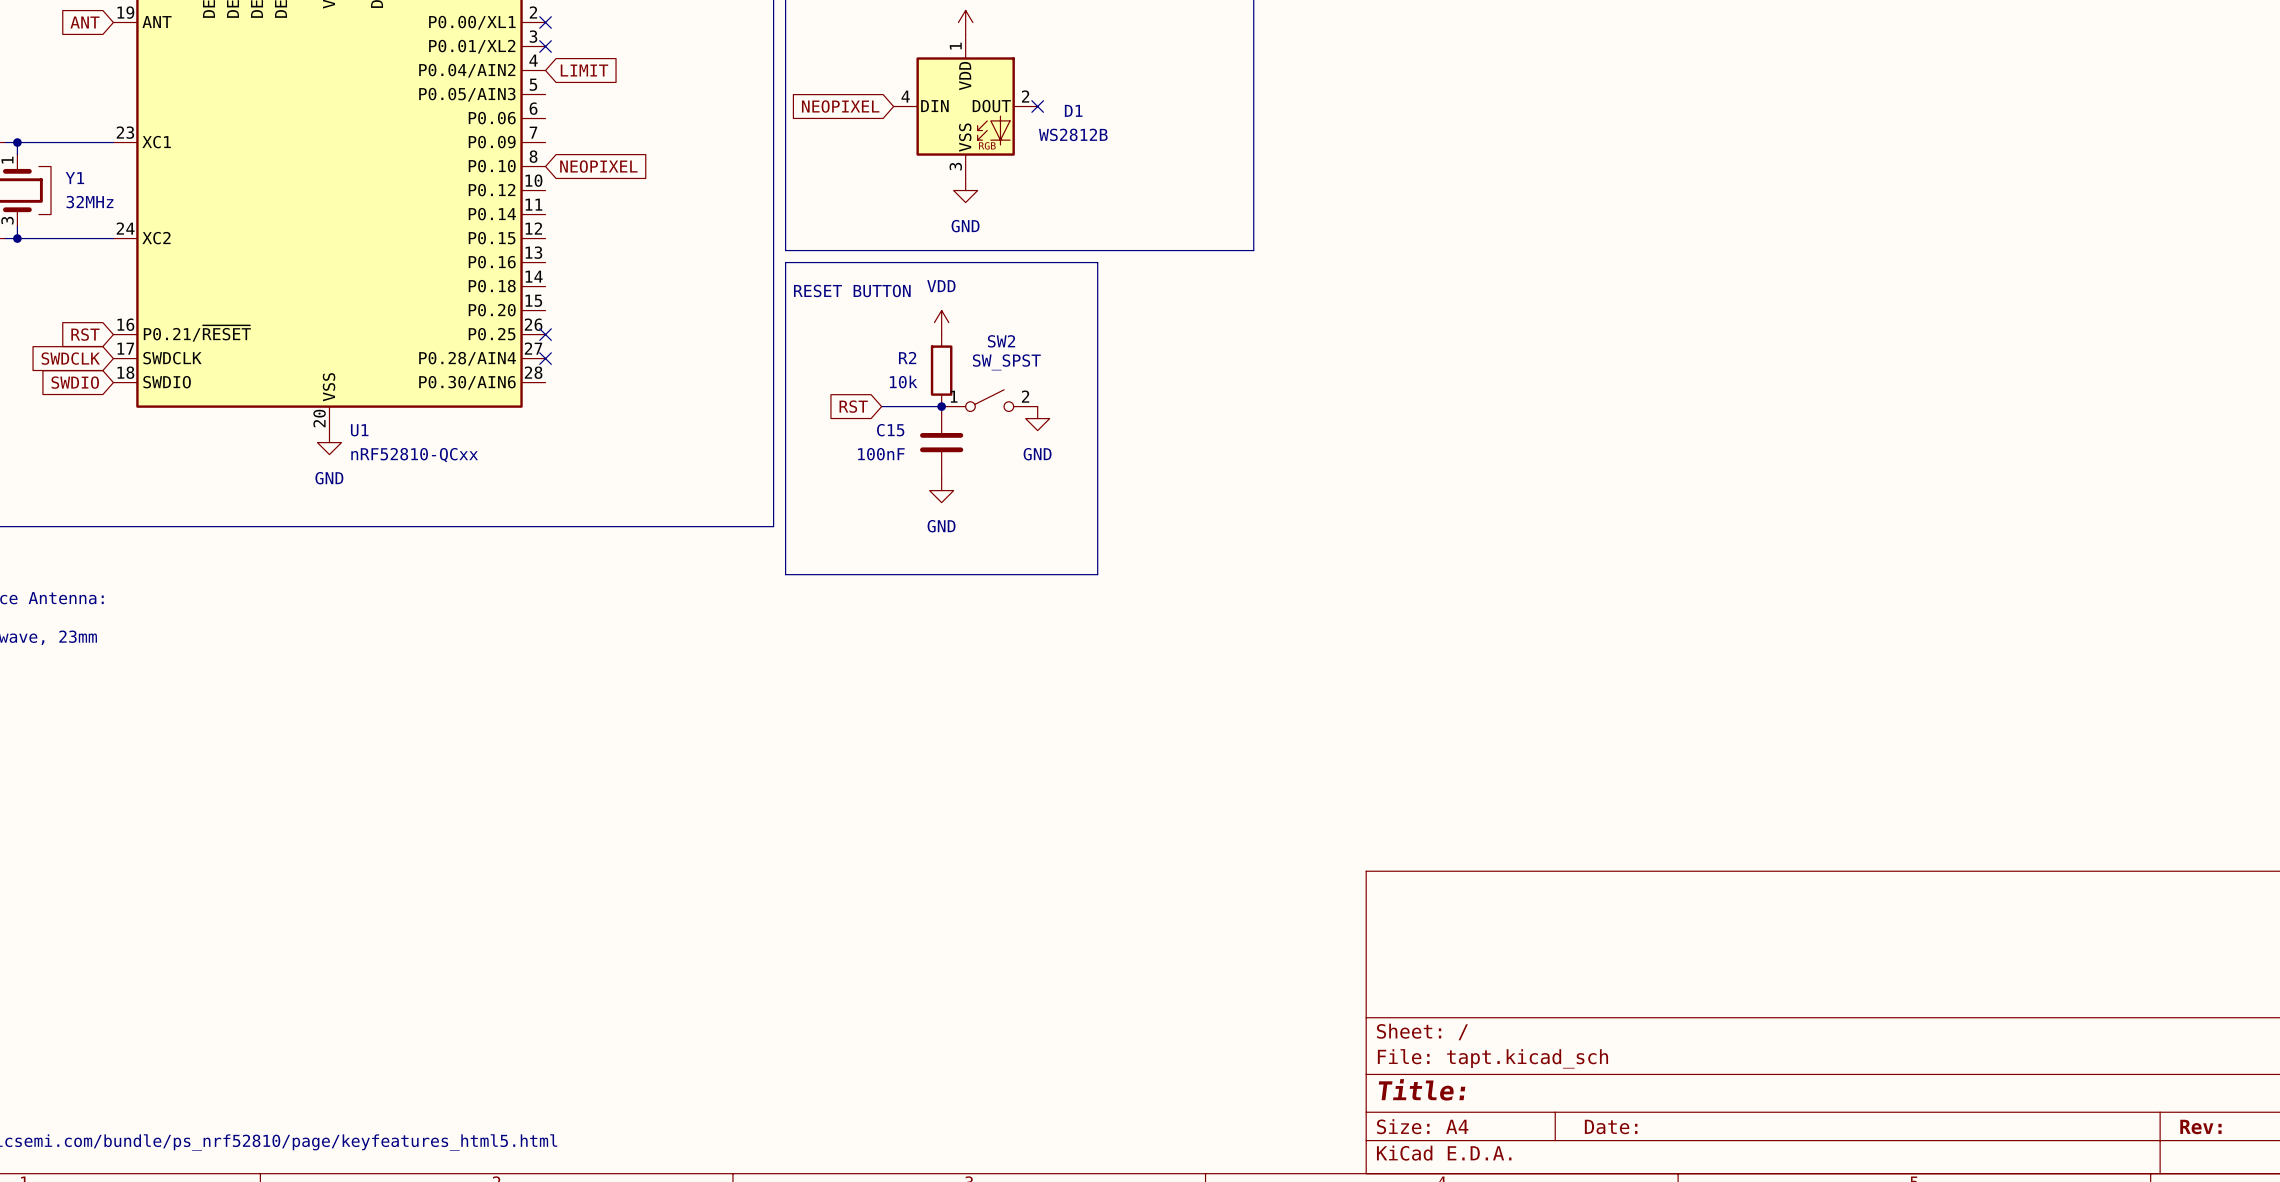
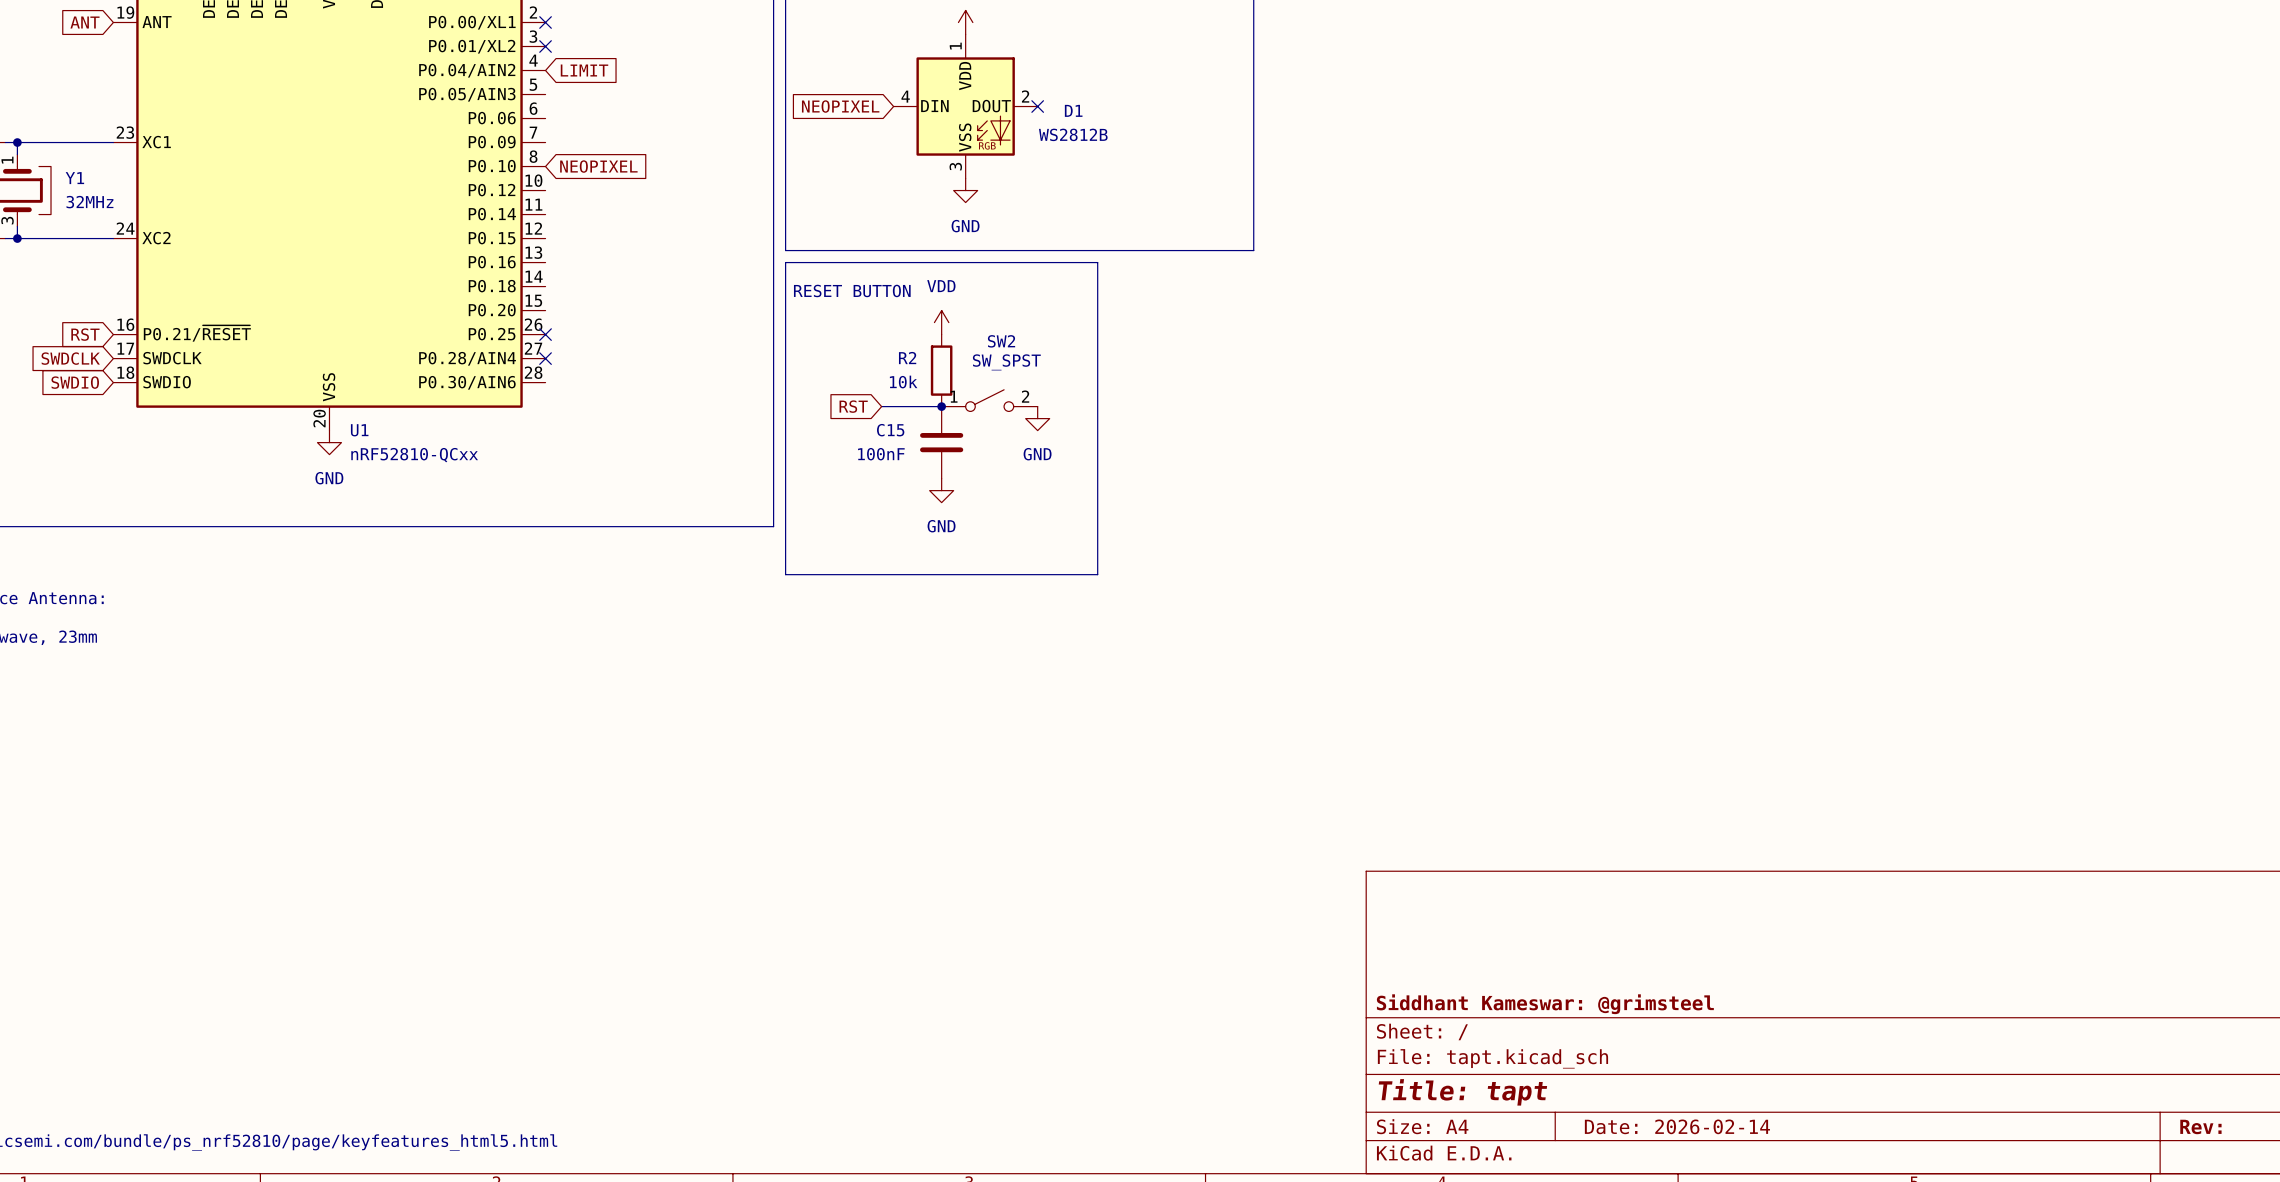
title block: none -> Siddhant Kameswar: @grimsteel (1545, 1004)
title block: Title: (1422, 1089) -> Title: tapt (1462, 1092)
title block: Date: (1611, 1126) -> Date: 2026-02-14 (1677, 1126)

